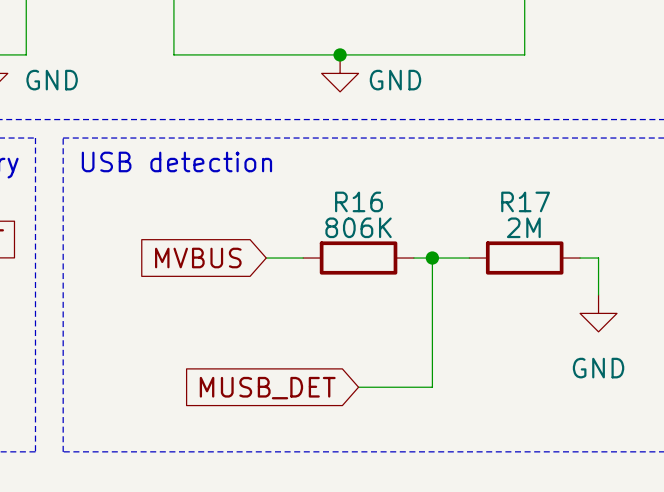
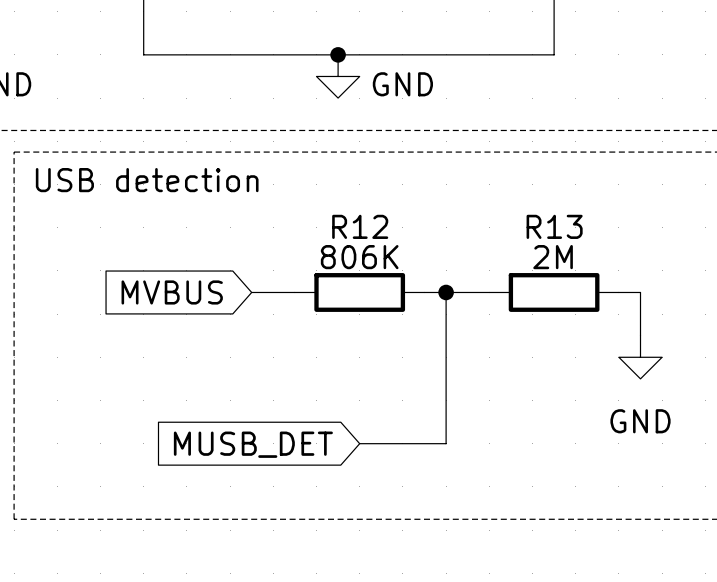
R16 name: R16 (358, 201) -> R12 (360, 226)
R17 name: R17 (525, 201) -> R13 (554, 226)

